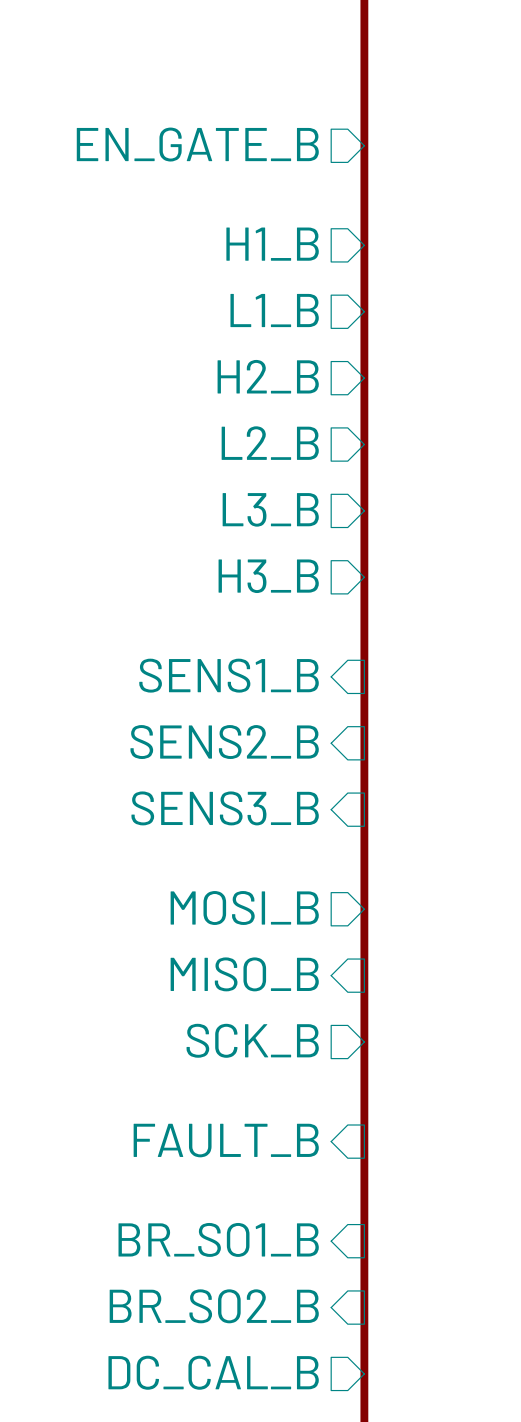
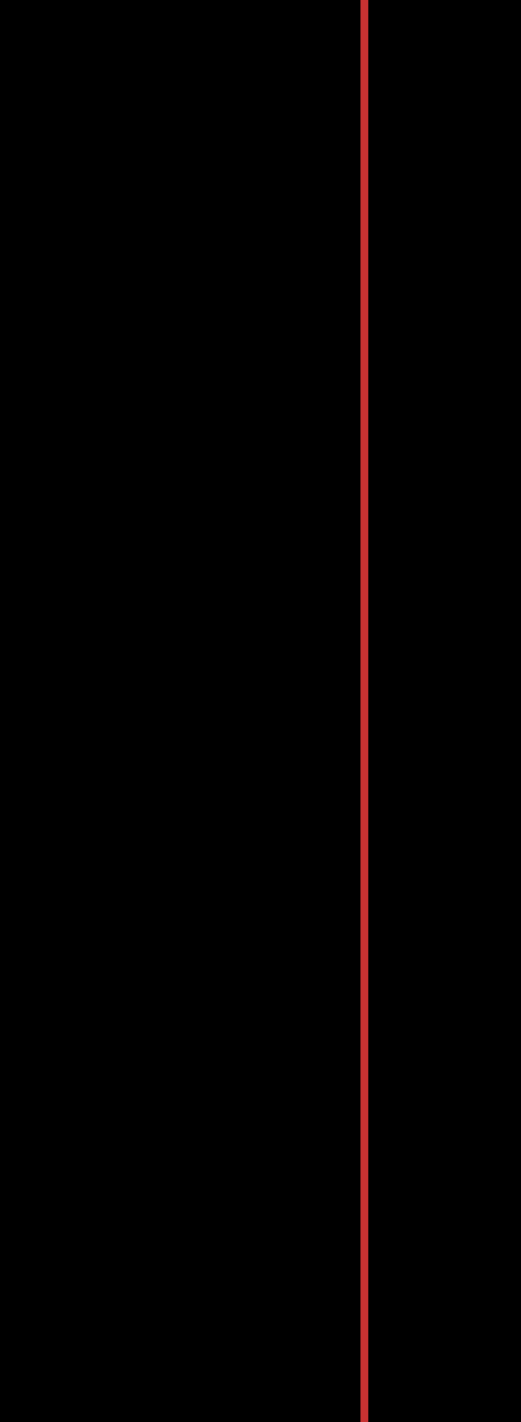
sheet pin: EN_GATE_B (197, 144) -> none
sheet pin: H1_B (272, 244) -> none
sheet pin: L1_B (274, 310) -> none
sheet pin: H2_B (268, 376) -> none
sheet pin: L2_B (270, 443) -> none
sheet pin: L3_B (270, 509) -> none
sheet pin: H3_B (268, 576) -> none
sheet pin: SENS1_B (229, 675) -> none
sheet pin: SENS2_B (224, 742) -> none
sheet pin: SENS3_B (225, 808) -> none
sheet pin: MOSI_B (244, 908) -> none
sheet pin: MISO_B (244, 974) -> none
sheet pin: SCK_B (252, 1040) -> none
sheet pin: FAULT_B (226, 1140) -> none
sheet pin: BR_SO1_B (218, 1239) -> none
sheet pin: BR_SO2_B (214, 1306) -> none
sheet pin: DC_CAL_B (213, 1372) -> none

